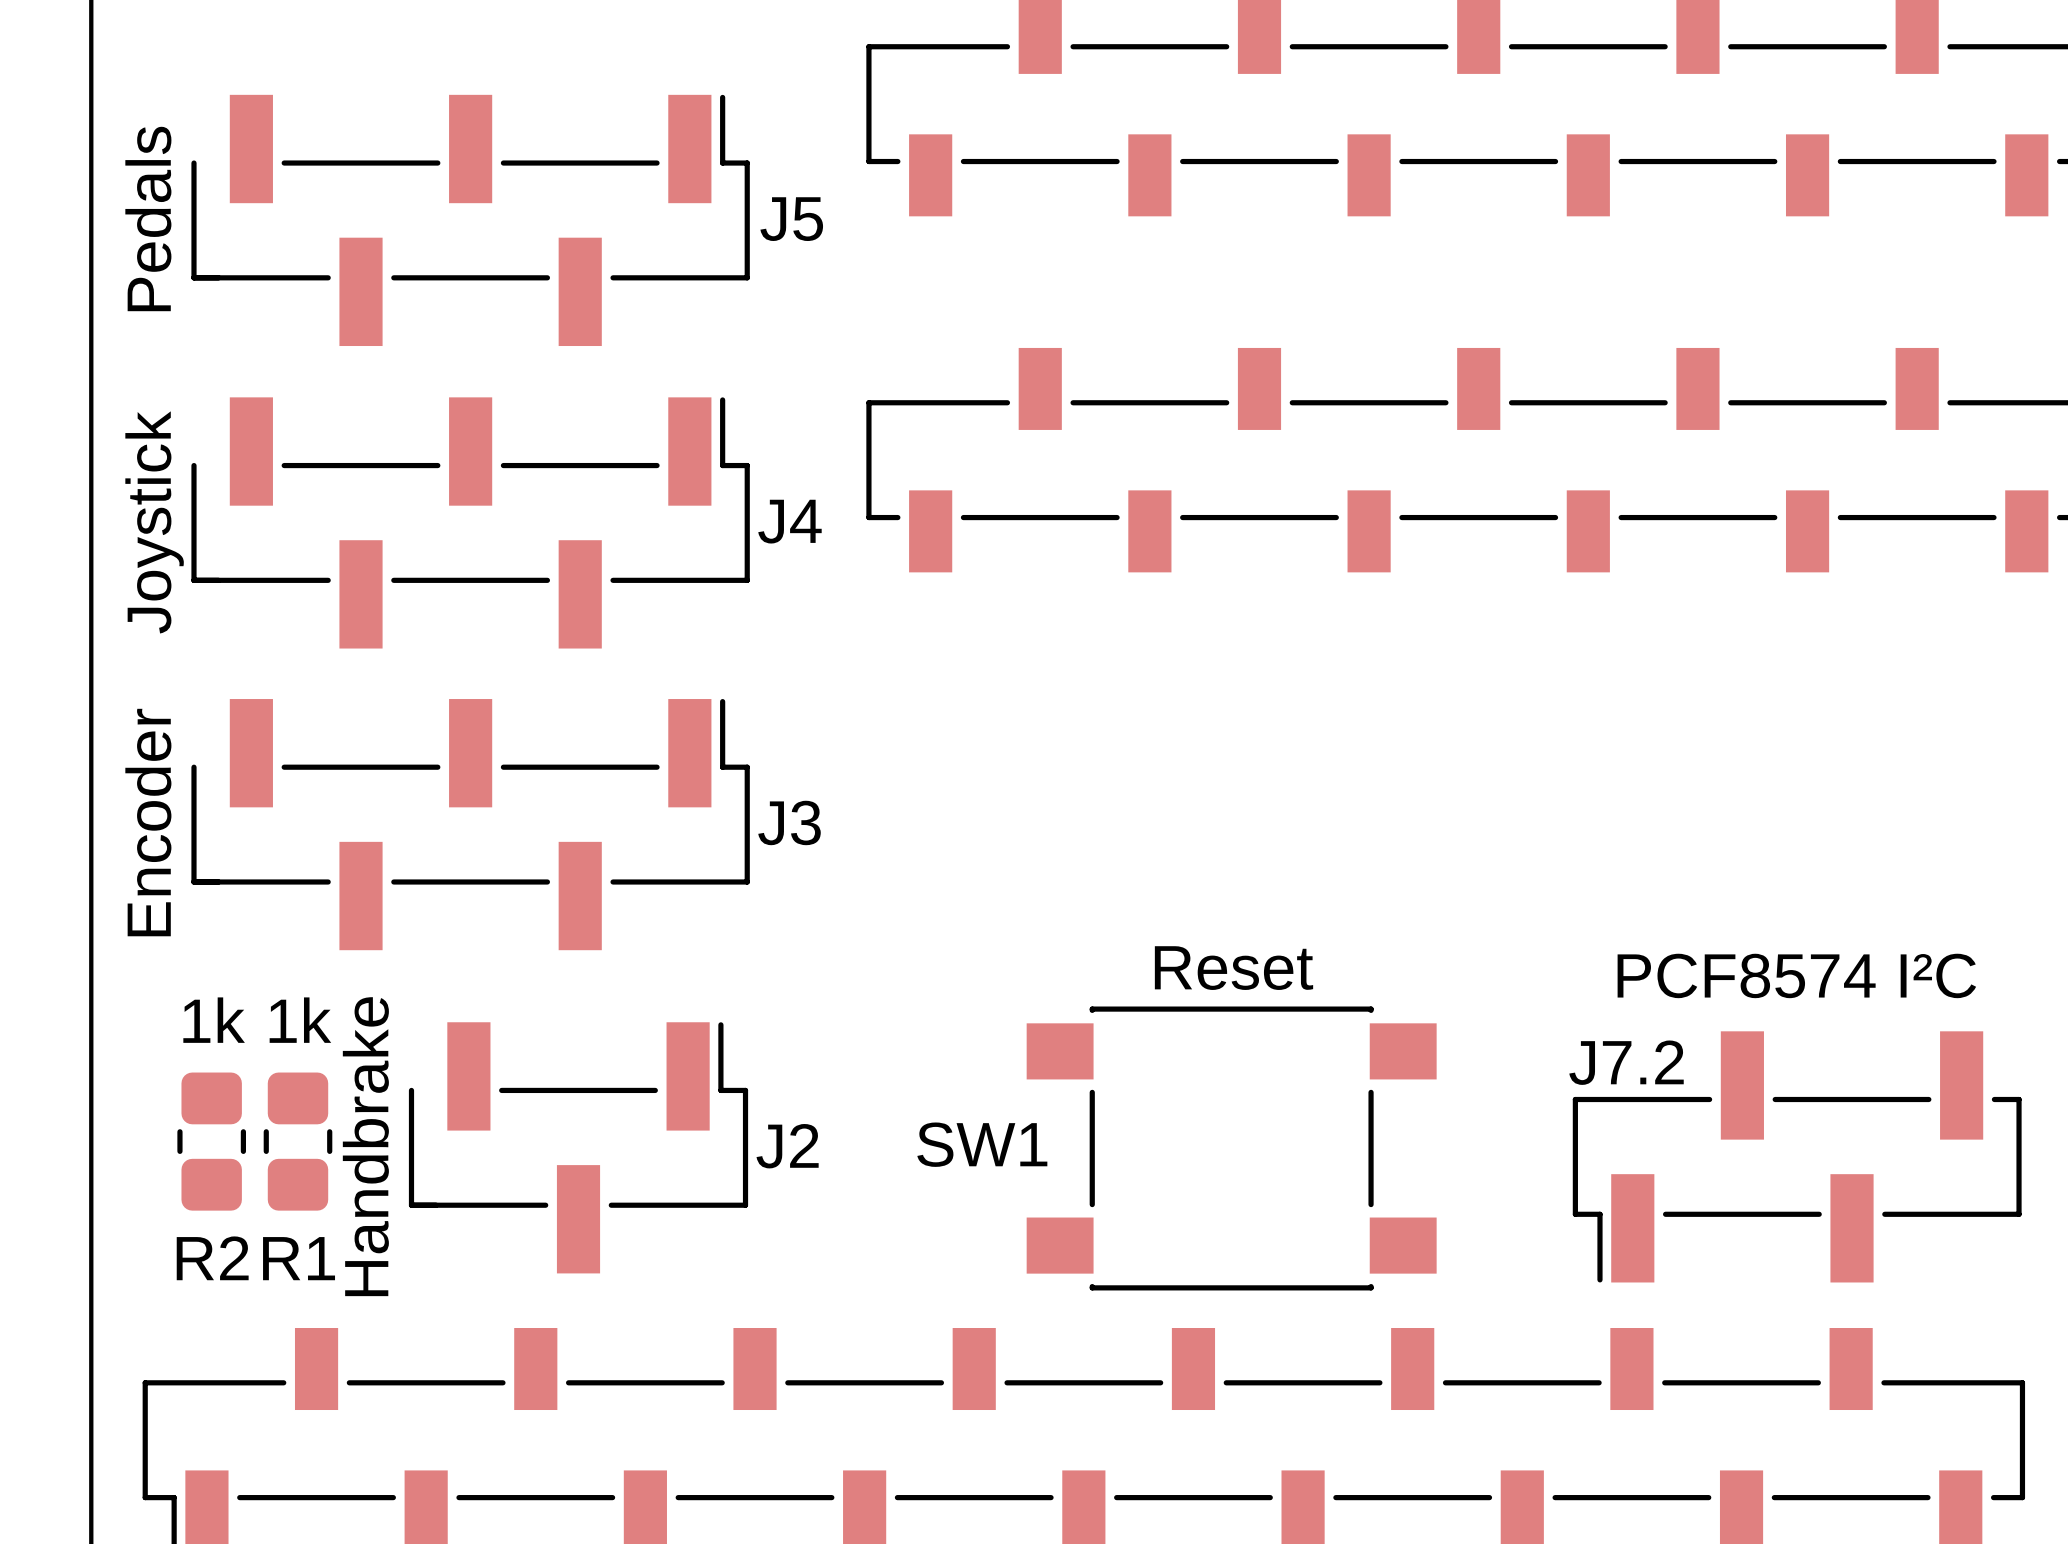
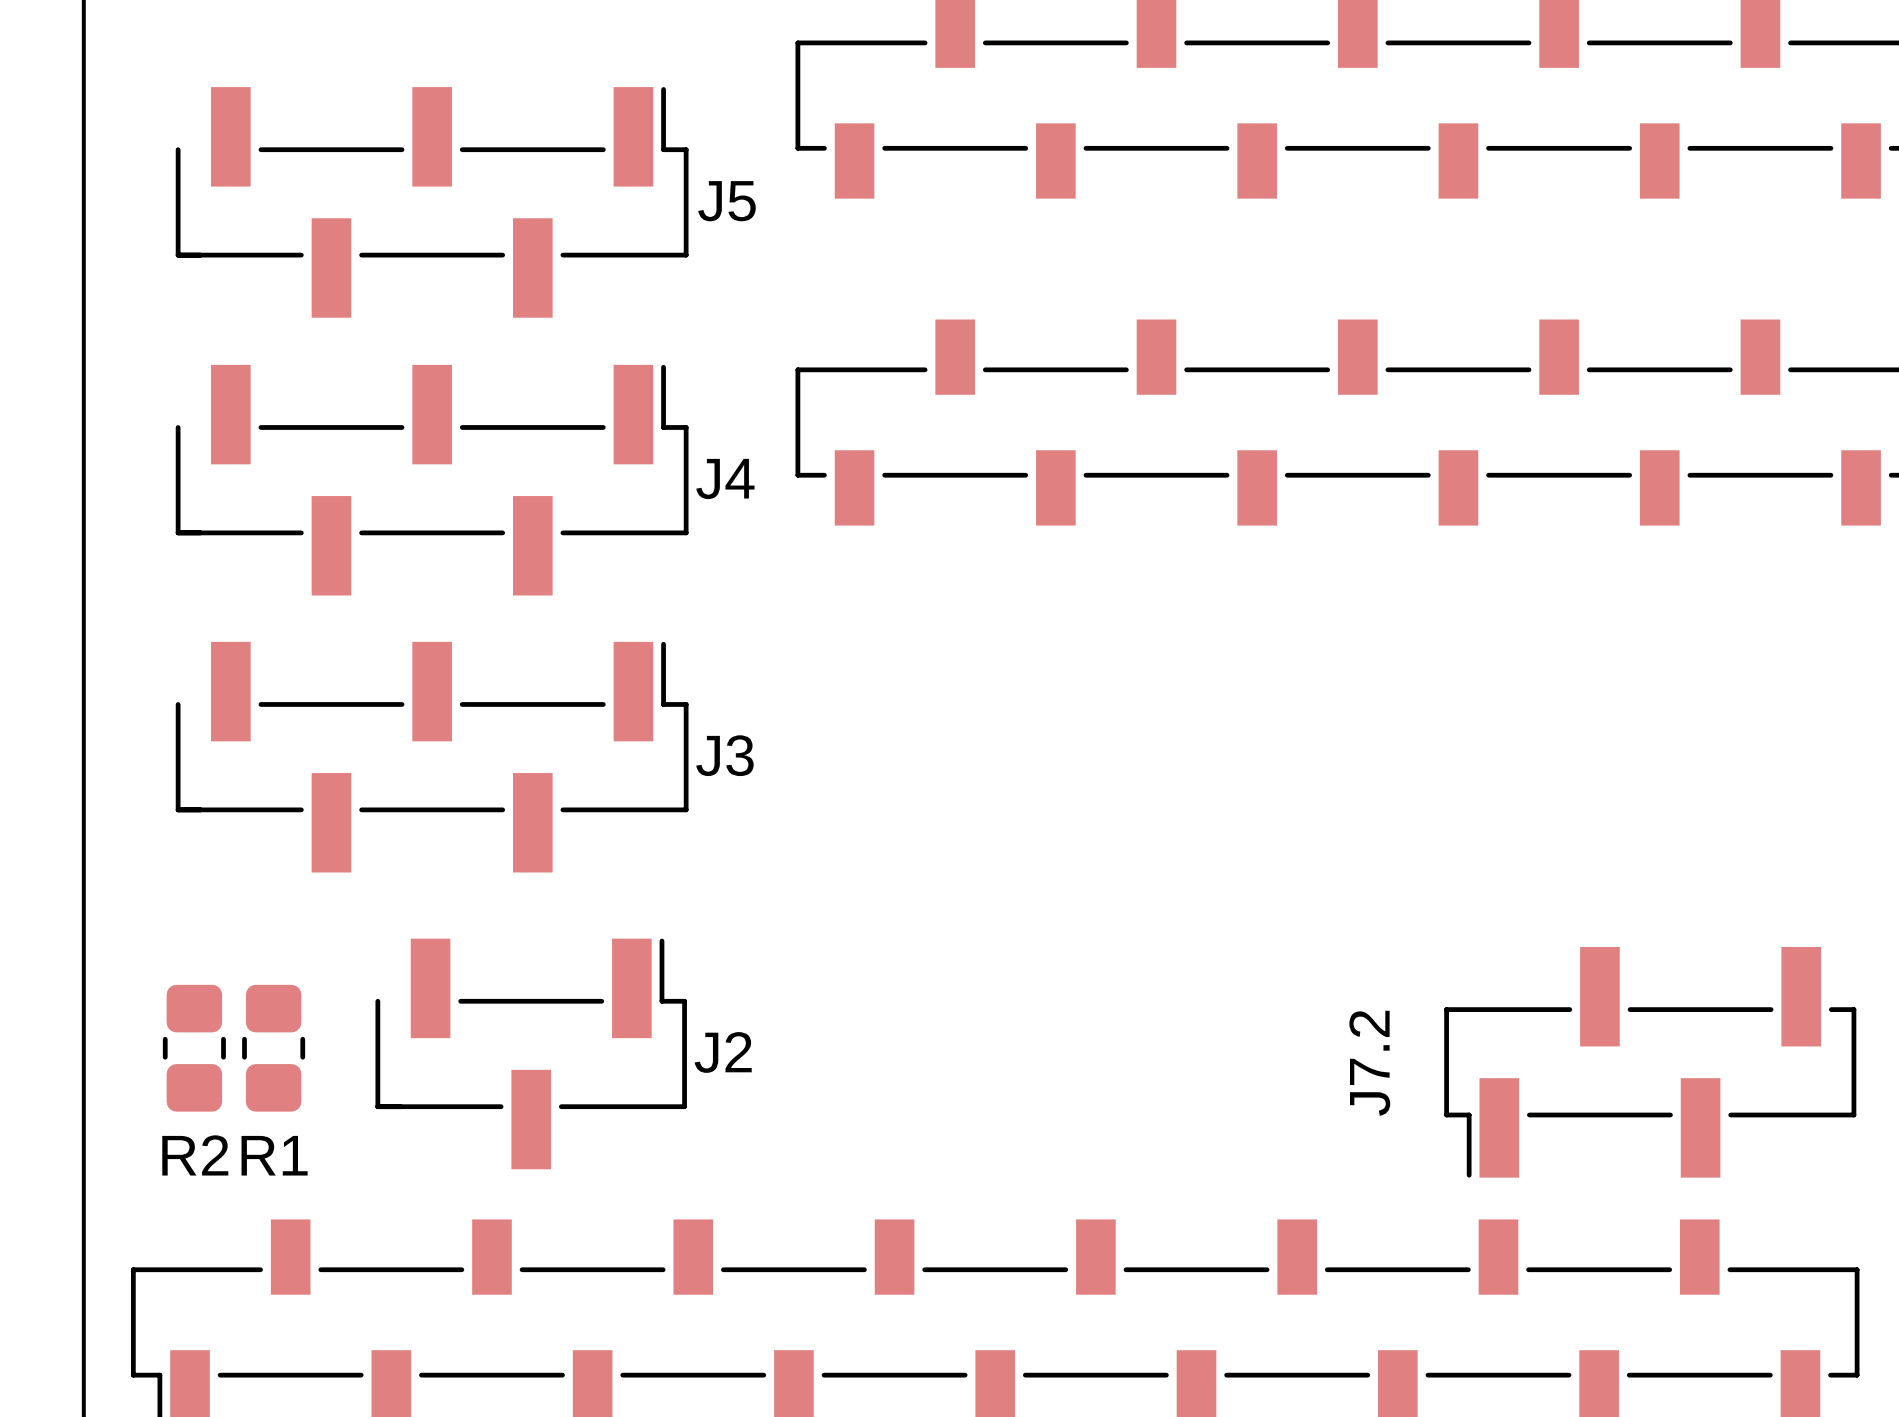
J5 value: Pedals (148, 218) -> none
J4 value: Joystick (154, 522) -> none
J3 value: Encoder (148, 822) -> none
J7.2 value: PCF8574 I²C (1796, 975) -> none
R2 value: 1k (214, 1020) -> none
R1 value: 1k (300, 1020) -> none
J7.2 name rotation: 0° (1626, 1062) -> 90° counterclockwise (1369, 1063)
J2 value: Handbrake (365, 1146) -> none
SW1: Reset (1231, 1148) -> none

